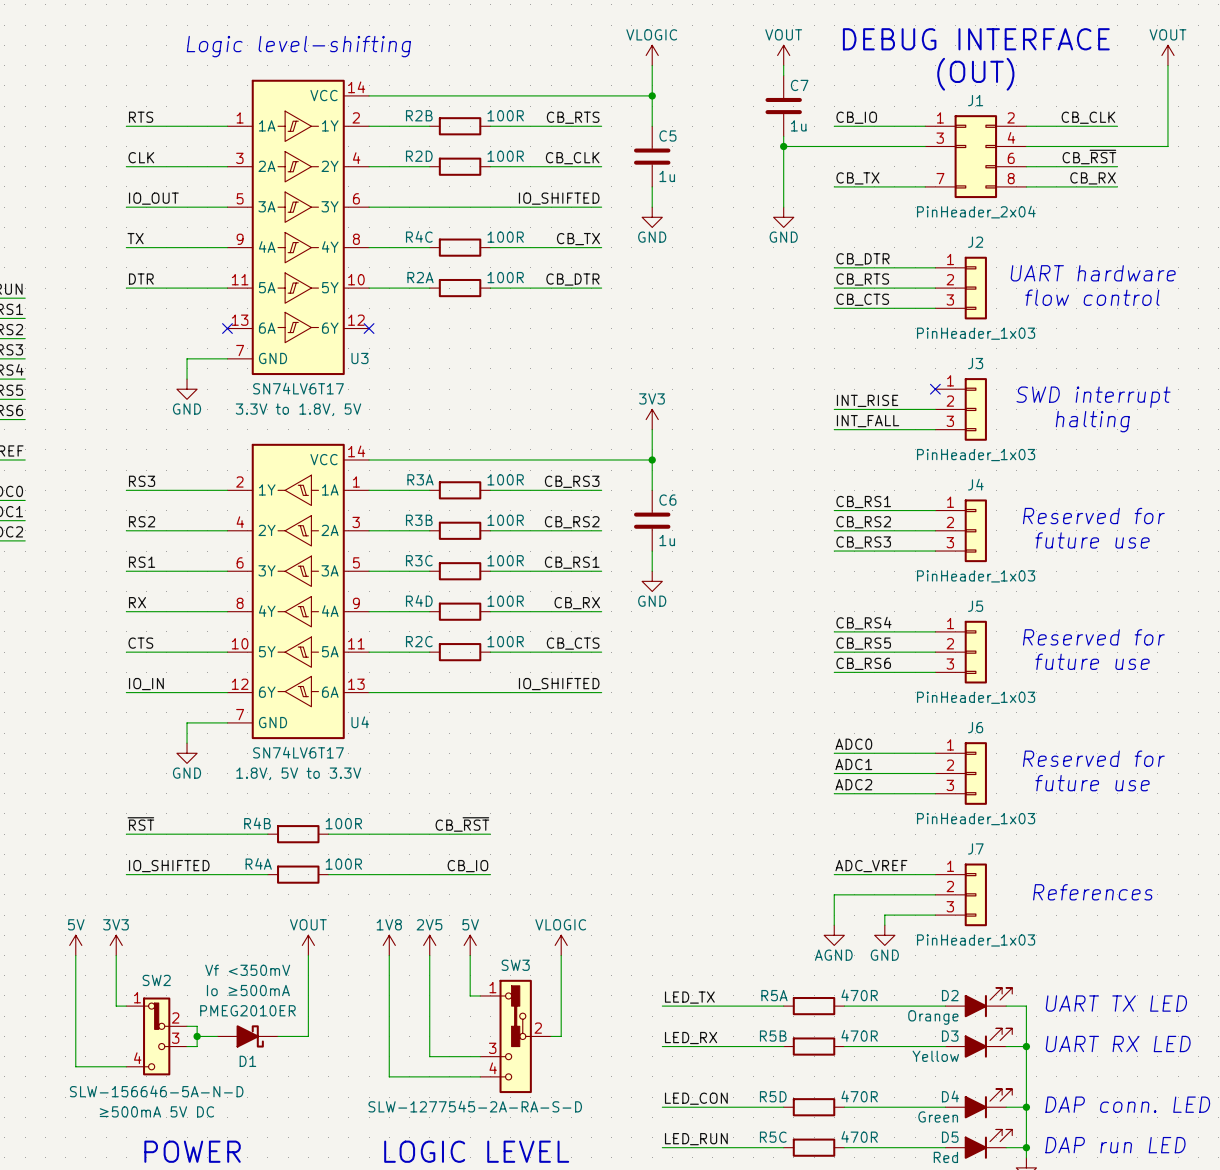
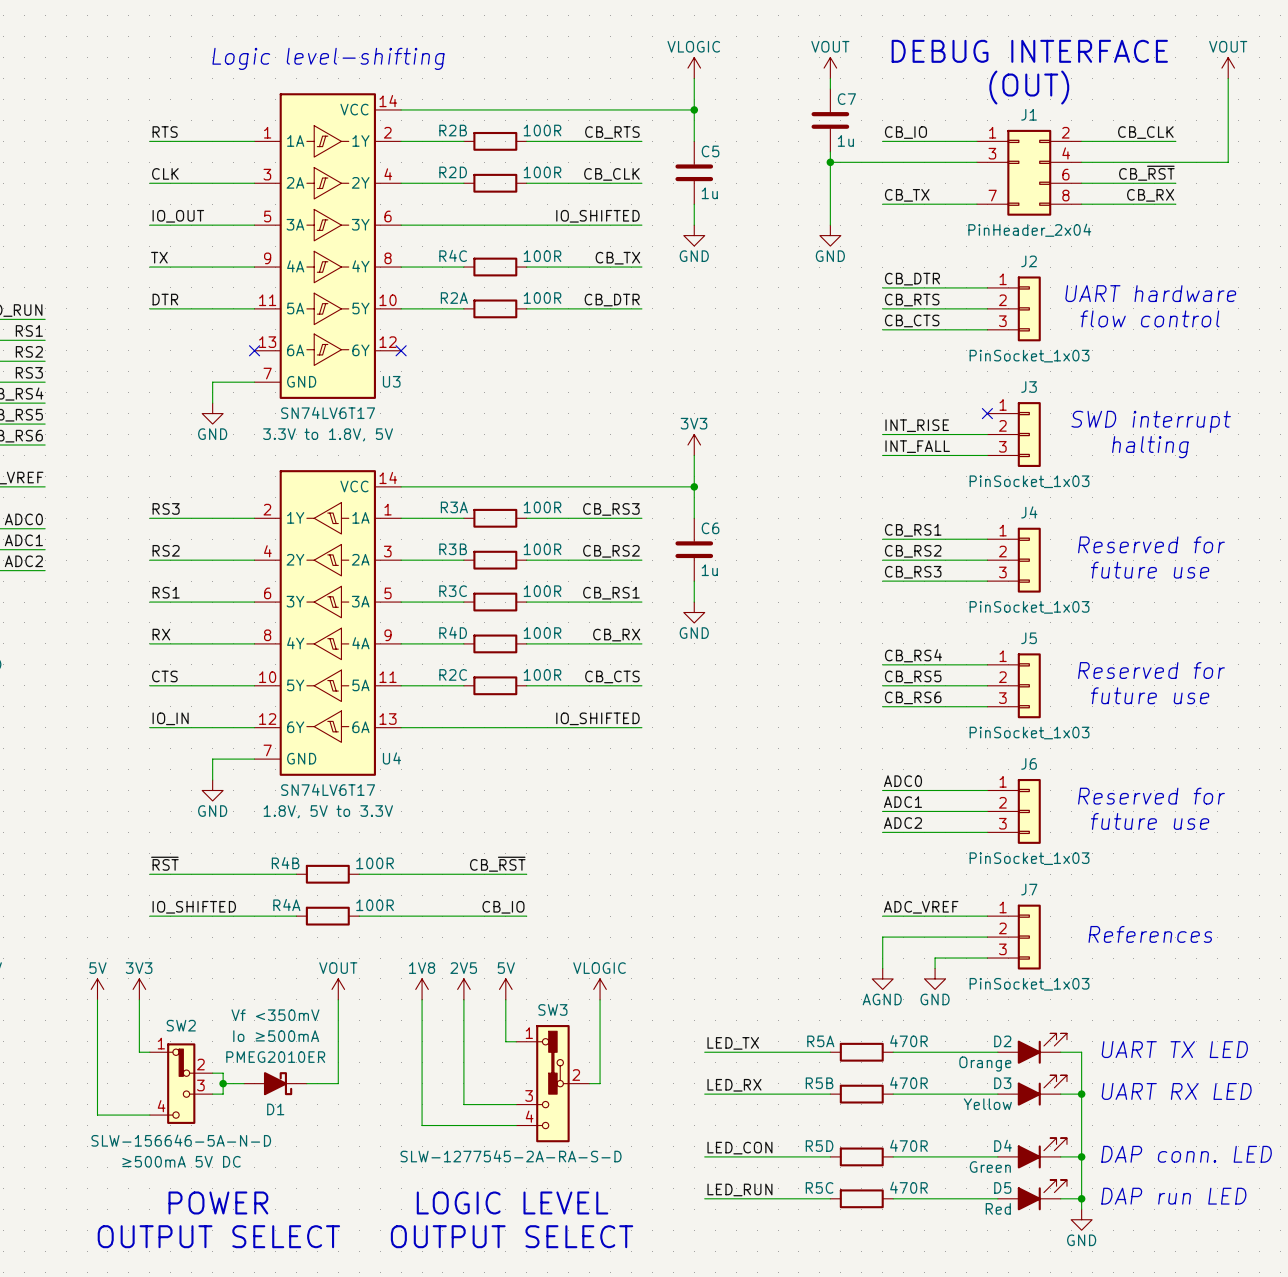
J2 value: PinHeader_1x03 (976, 333) -> PinSocket_1x03 (1029, 356)
J3 value: PinHeader_1x03 (976, 455) -> PinSocket_1x03 (1029, 481)
J4 value: PinHeader_1x03 (976, 576) -> PinSocket_1x03 (1029, 607)
J5 value: PinHeader_1x03 (976, 697) -> PinSocket_1x03 (1029, 733)
J6 value: PinHeader_1x03 (976, 819) -> PinSocket_1x03 (1029, 858)
J7 value: PinHeader_1x03 (976, 940) -> PinSocket_1x03 (1029, 984)

